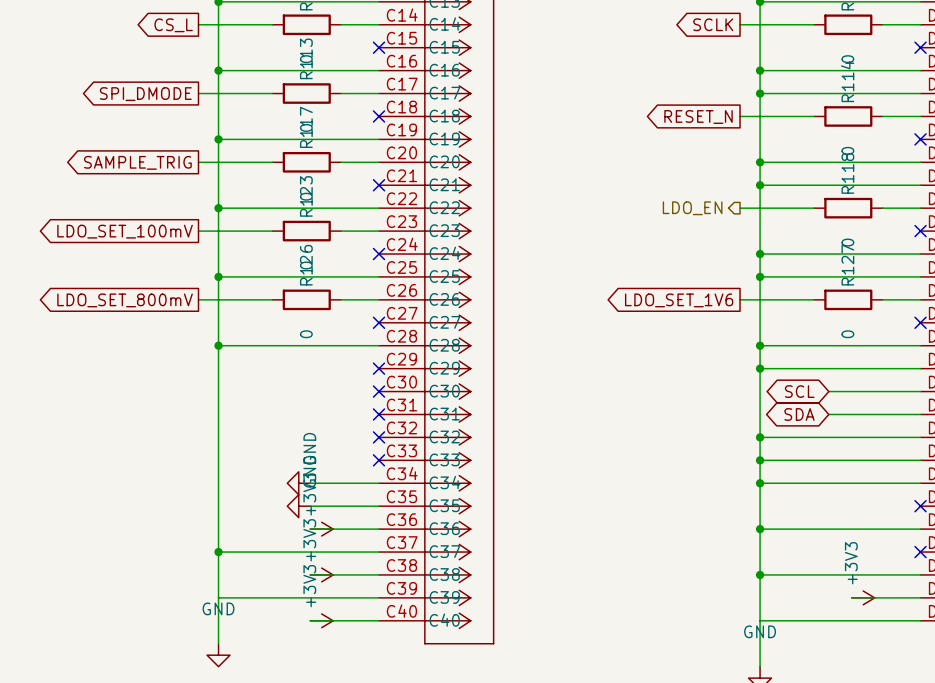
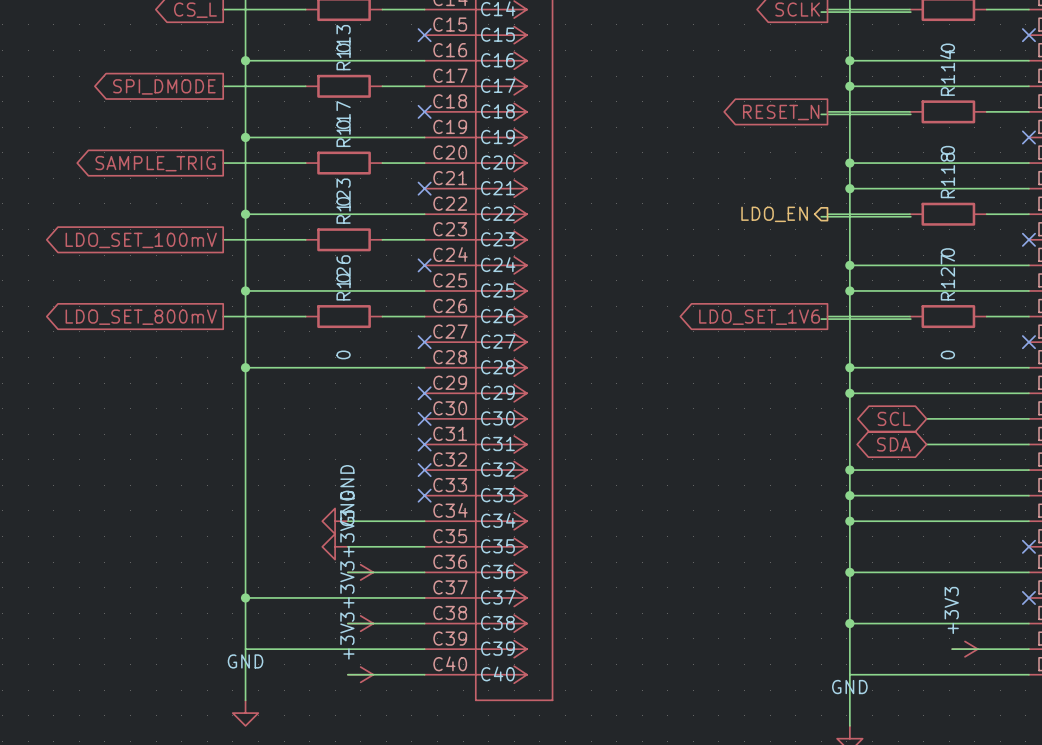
wire: none -> (821, 12) (910, 12)
wire: none -> (821, 114) (910, 114)
wire: none -> (821, 216) (910, 216)
wire: none -> (821, 319) (910, 319)

